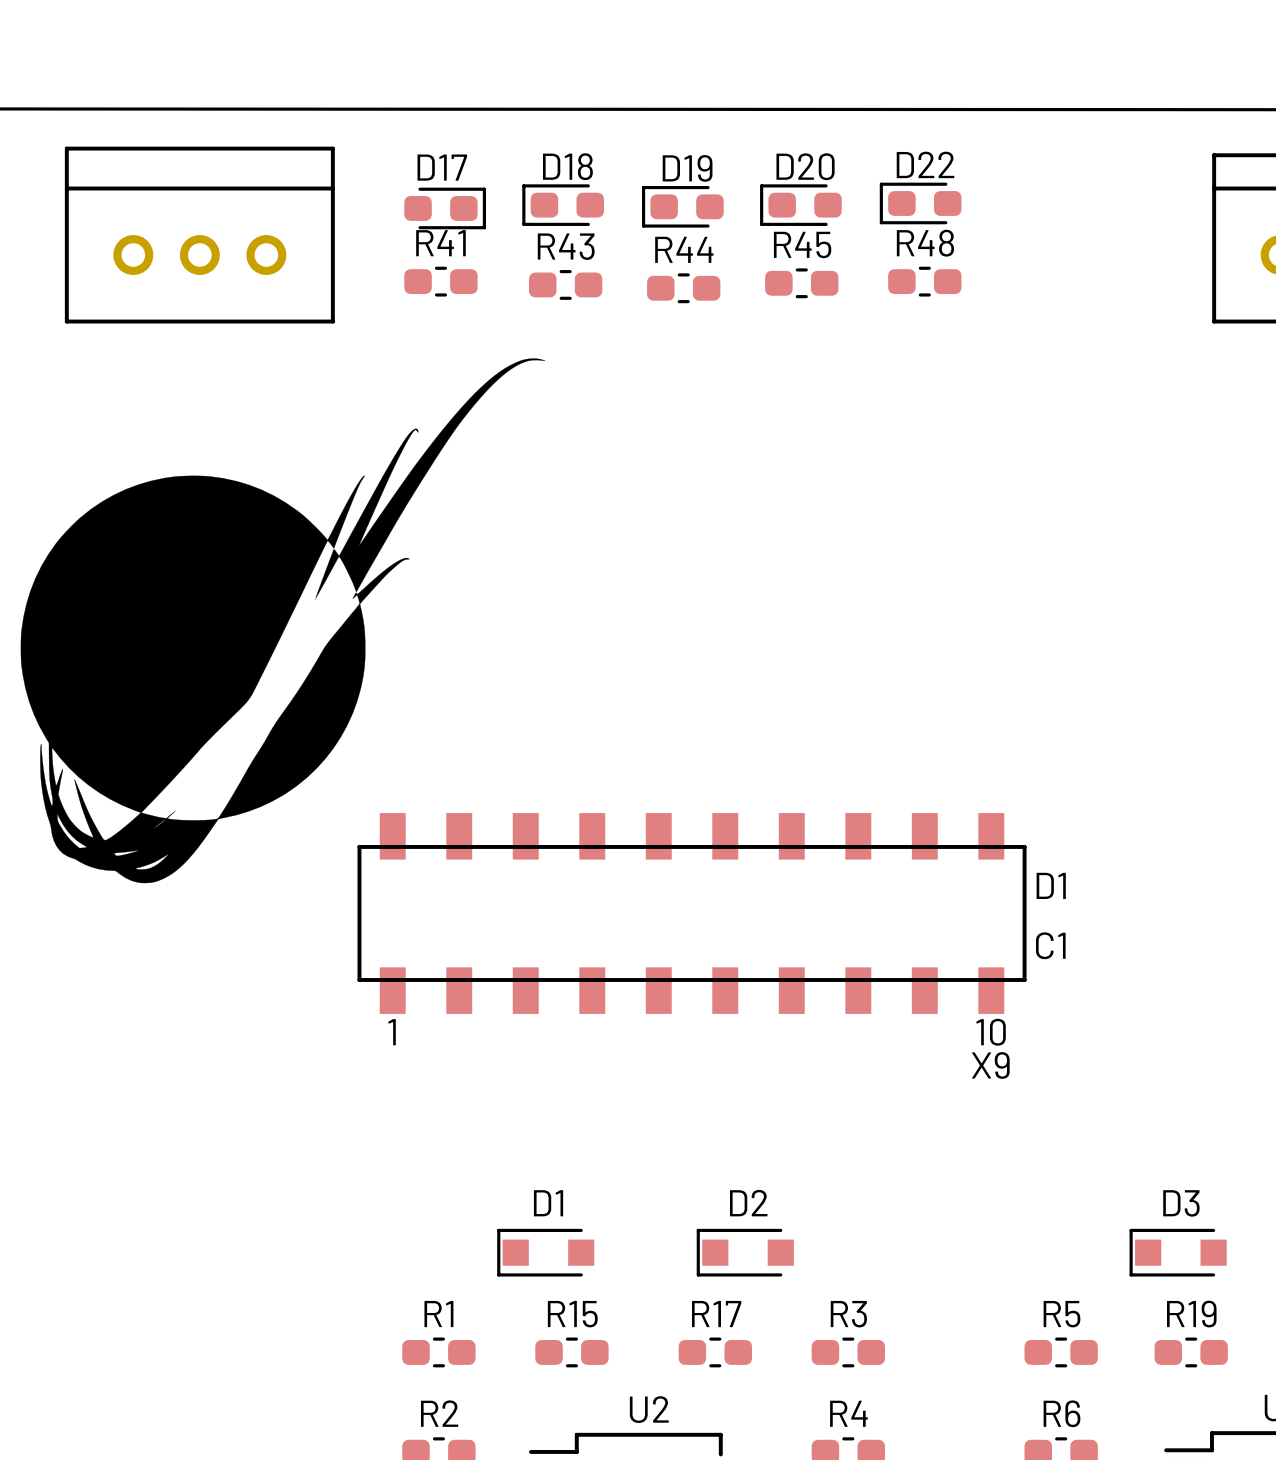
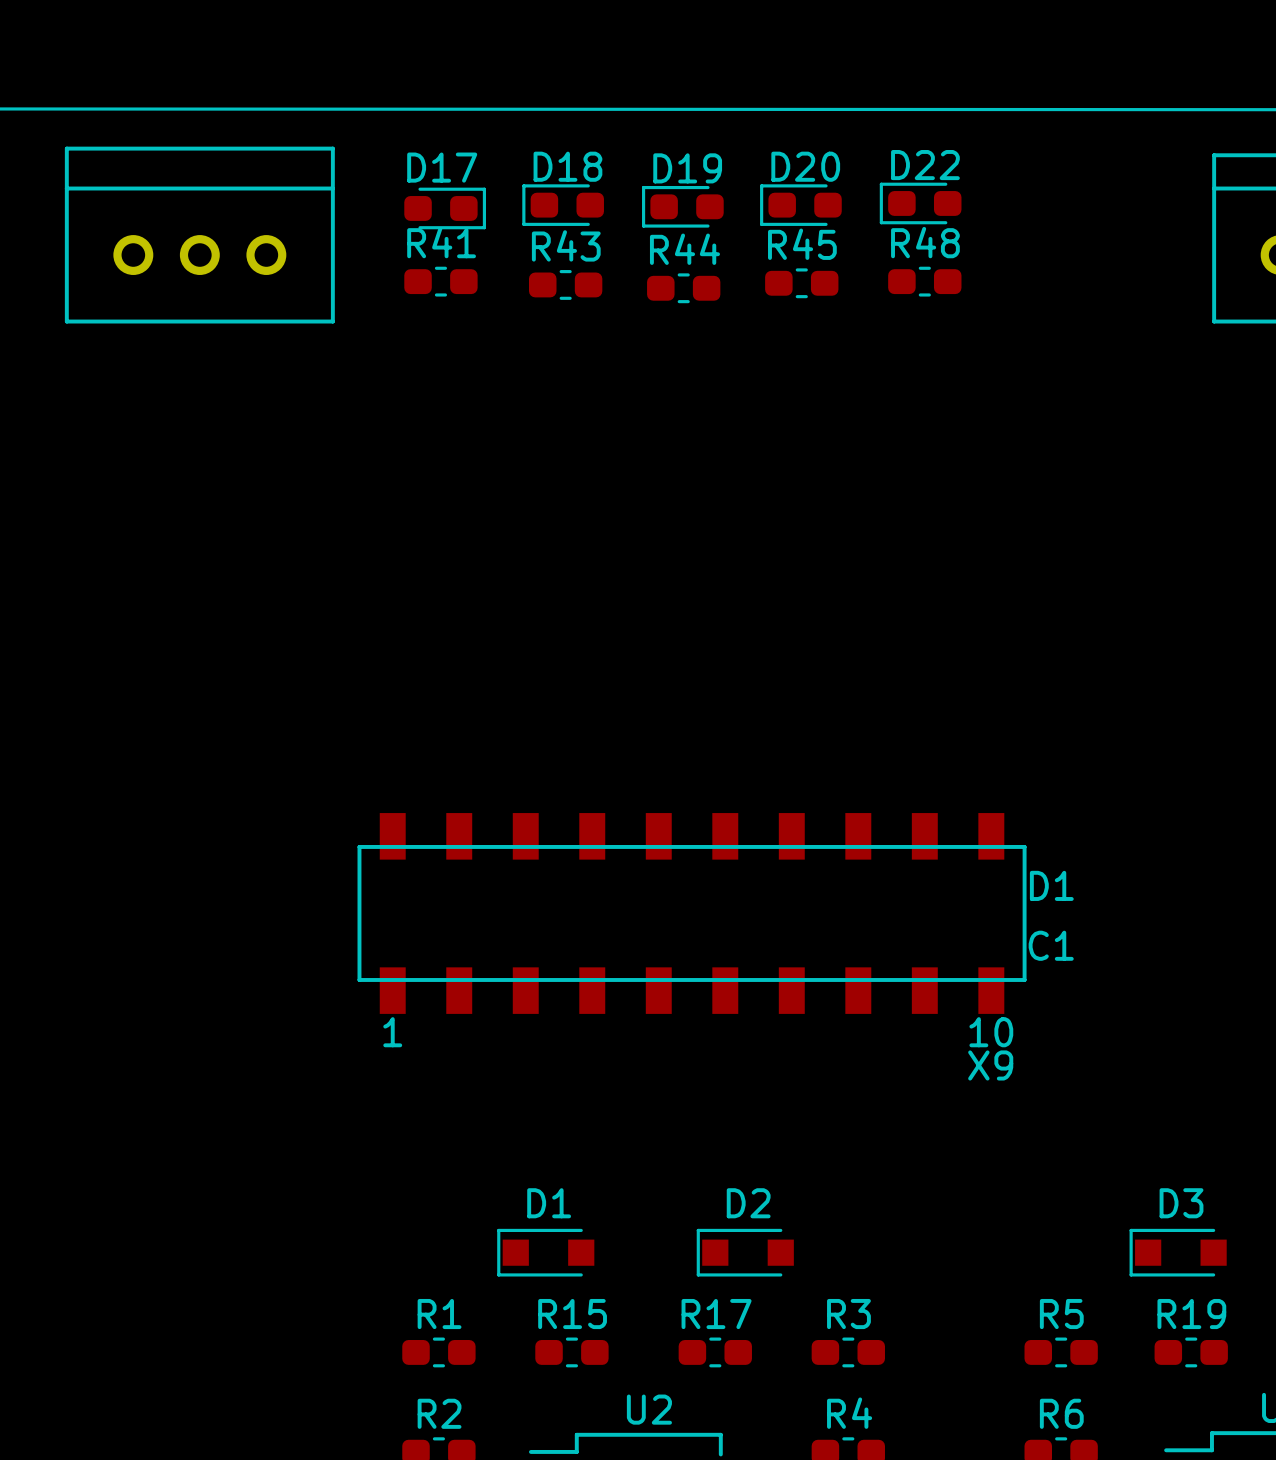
drawing: [20, 358, 546, 884] -> none

